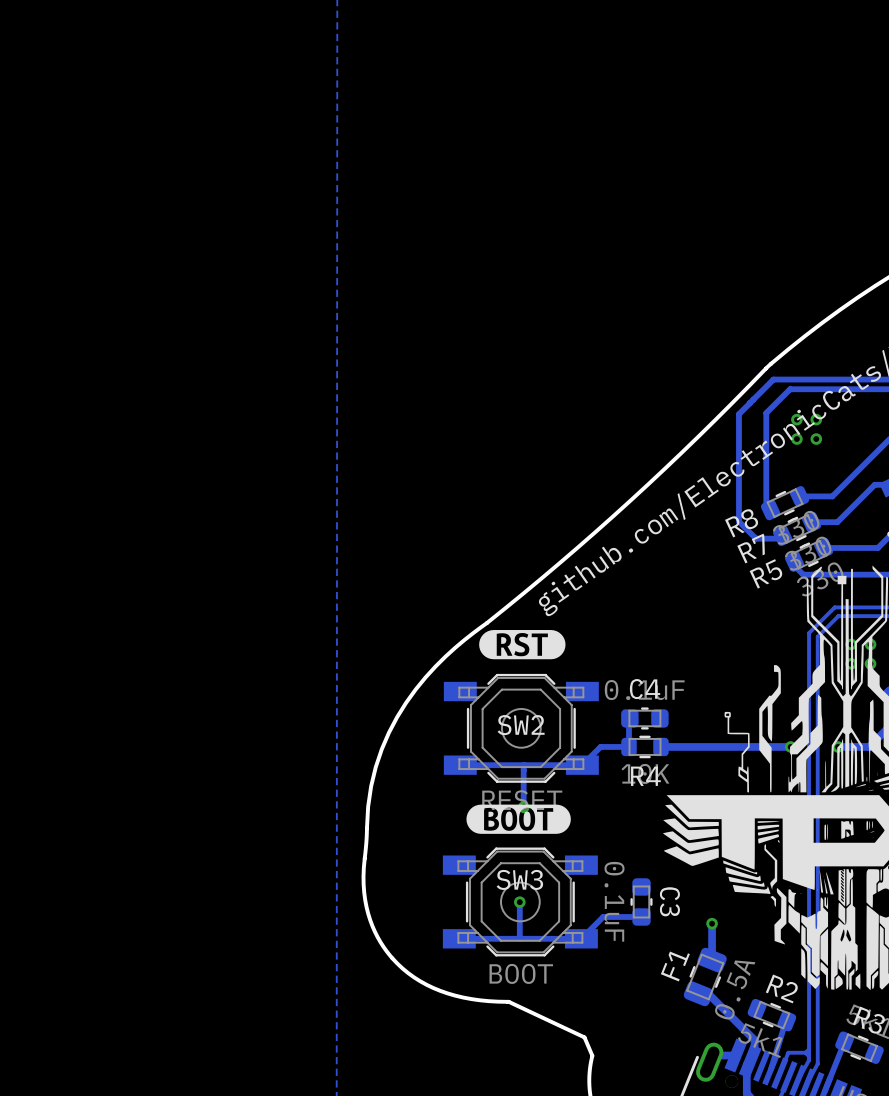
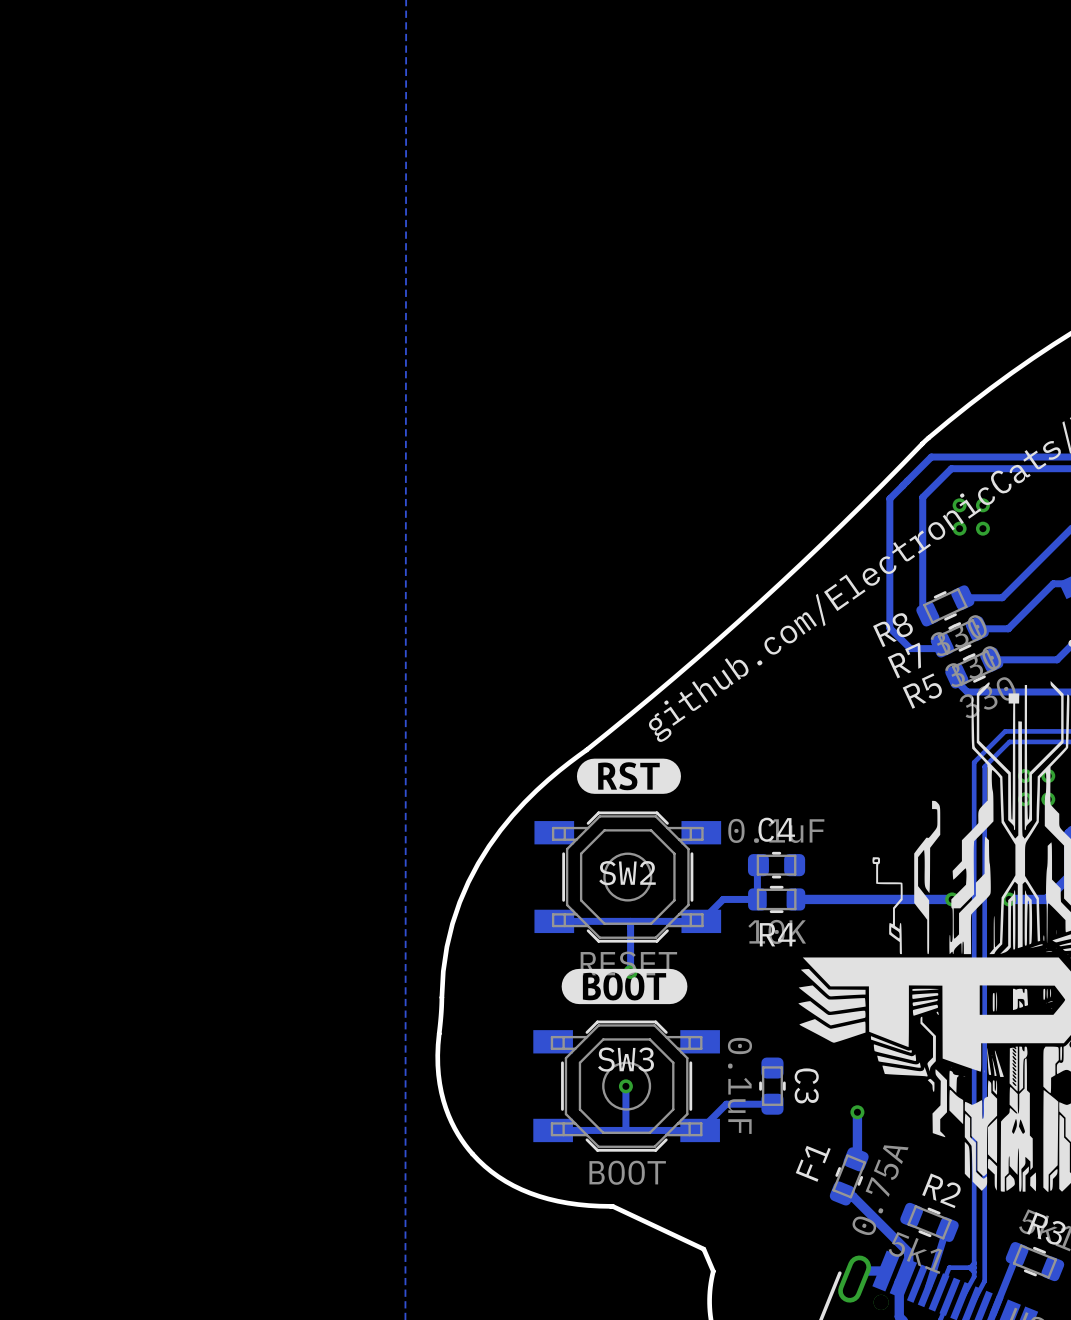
F1 footprint: [683, 947, 727, 1007] -> [829, 1147, 869, 1206]
F1 value: 0.5A (735, 990) -> 0.75A (880, 1190)

